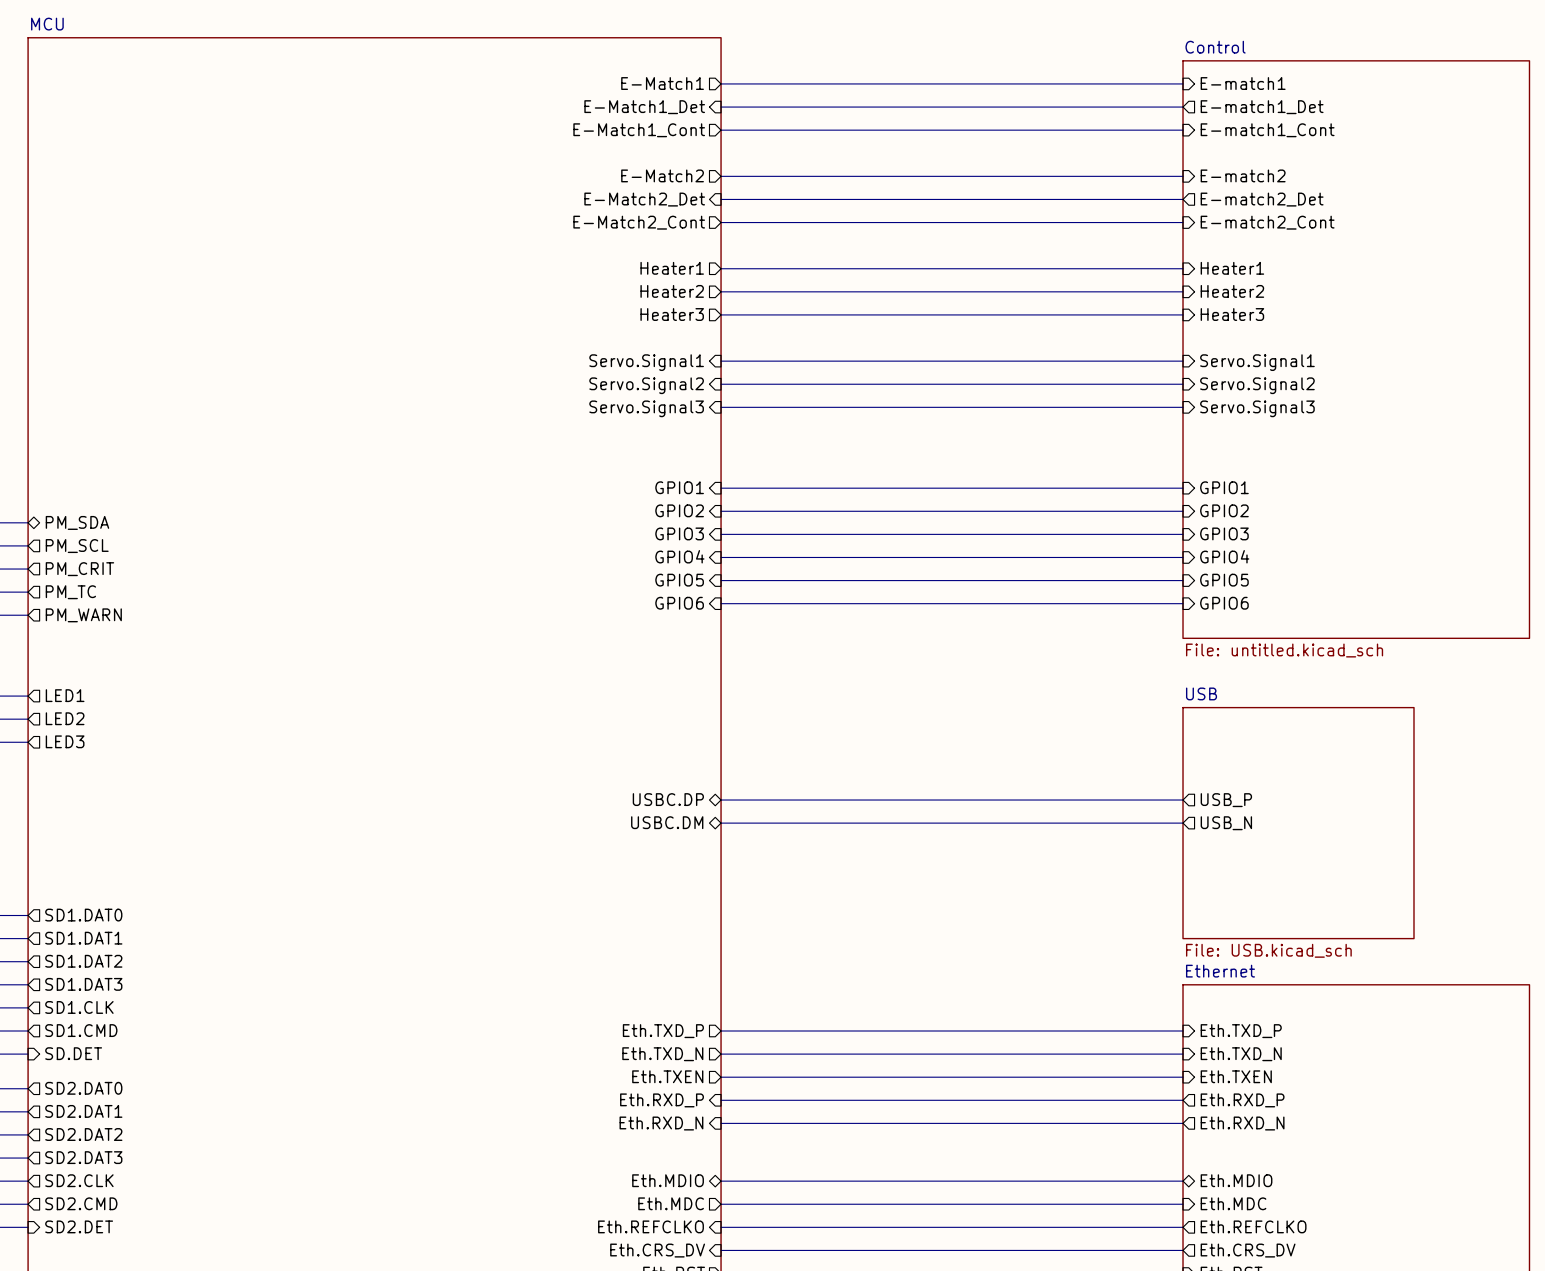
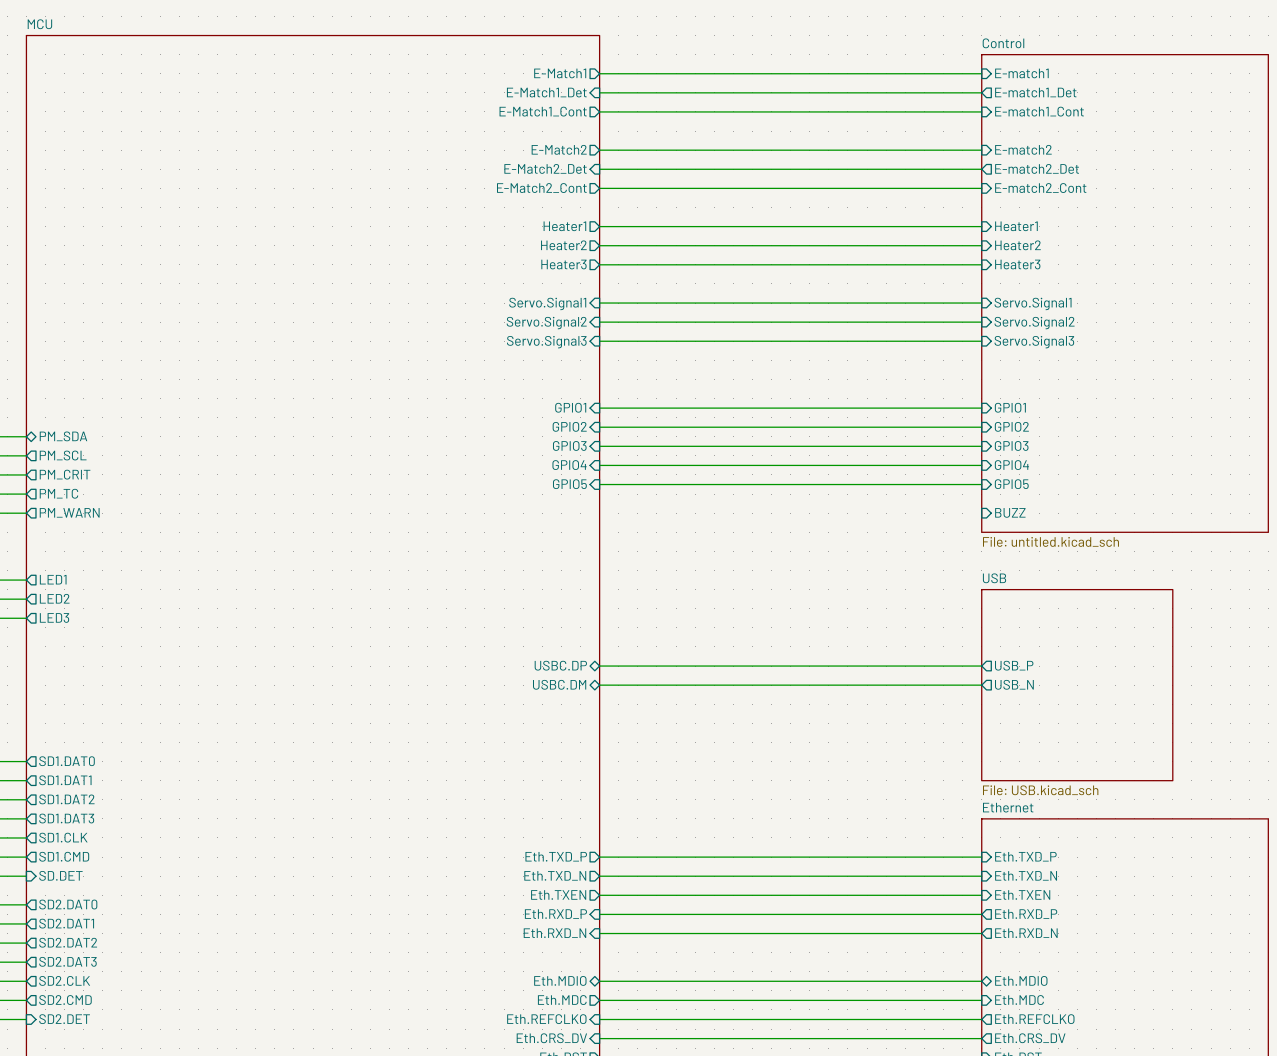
sheet pin: GPIO6 (679, 603) -> none
wire: (721, 603) (1183, 603) -> none
sheet pin: GPIO6 (1224, 603) -> none
sheet pin: none -> BUZZ (1010, 512)

